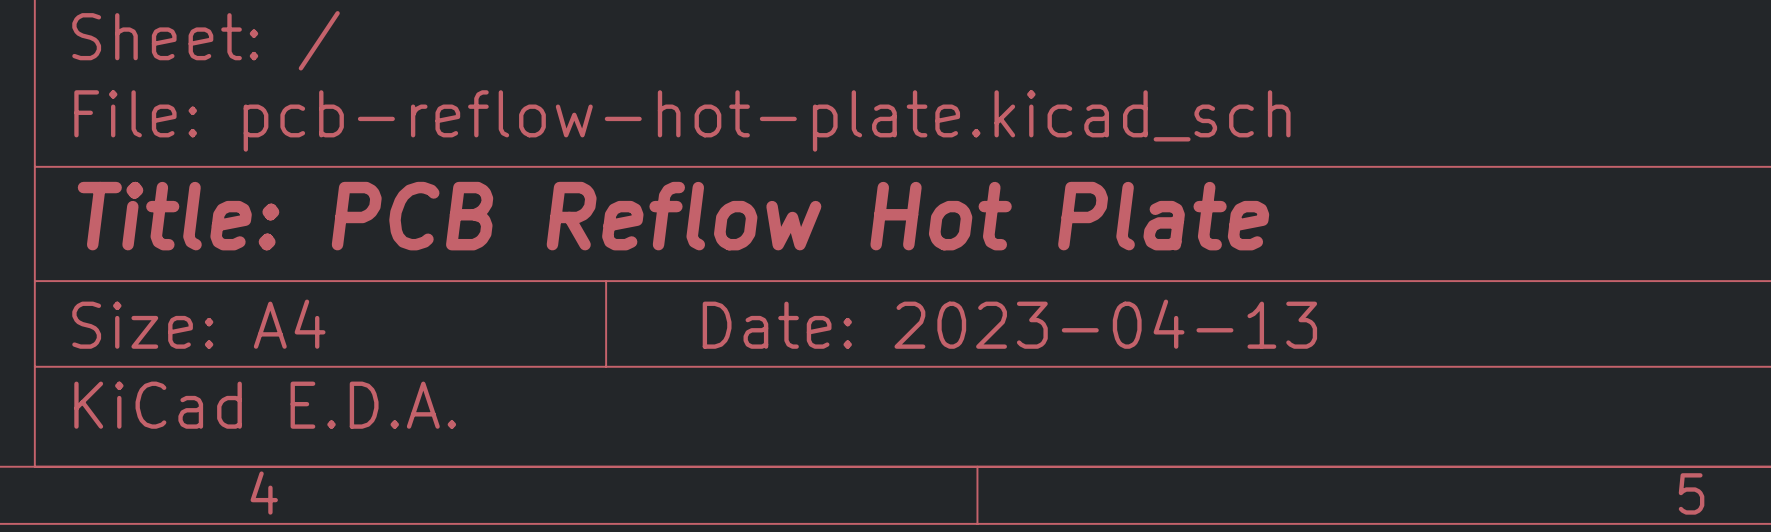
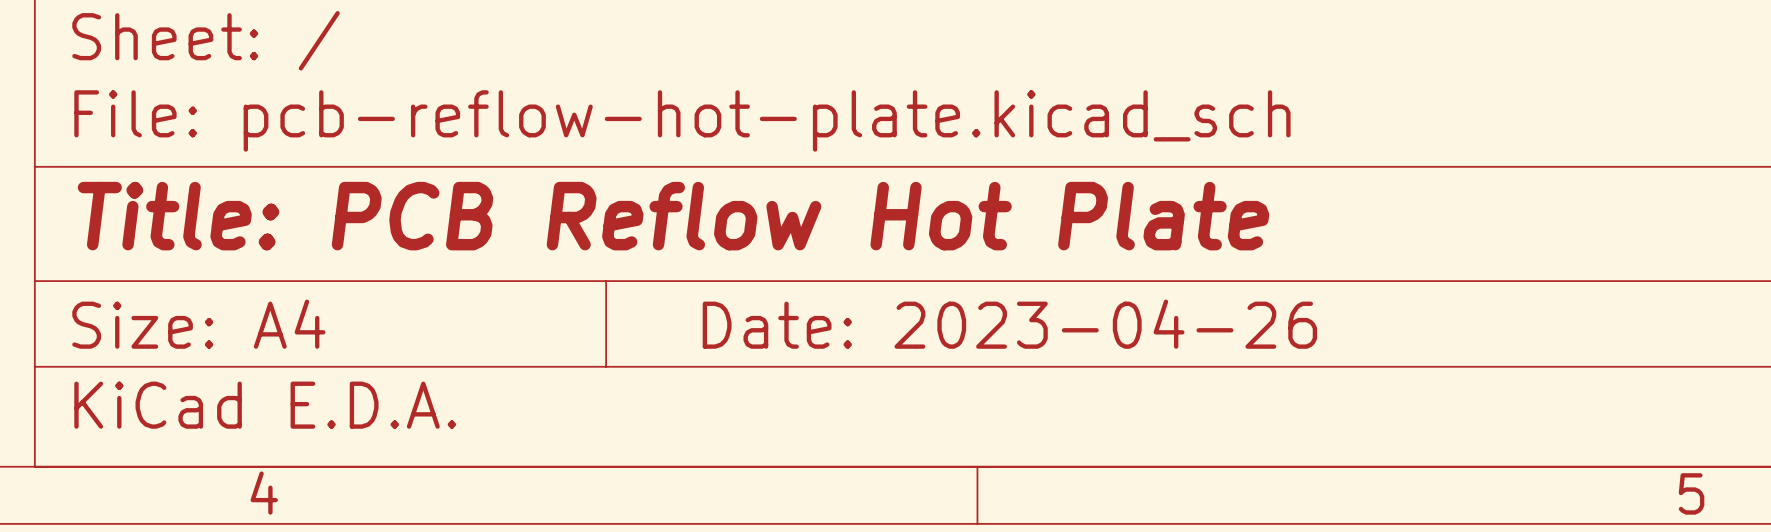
title block: Date: 2023-04-13 (1009, 324) -> Date: 2023-04-26 (1009, 324)

